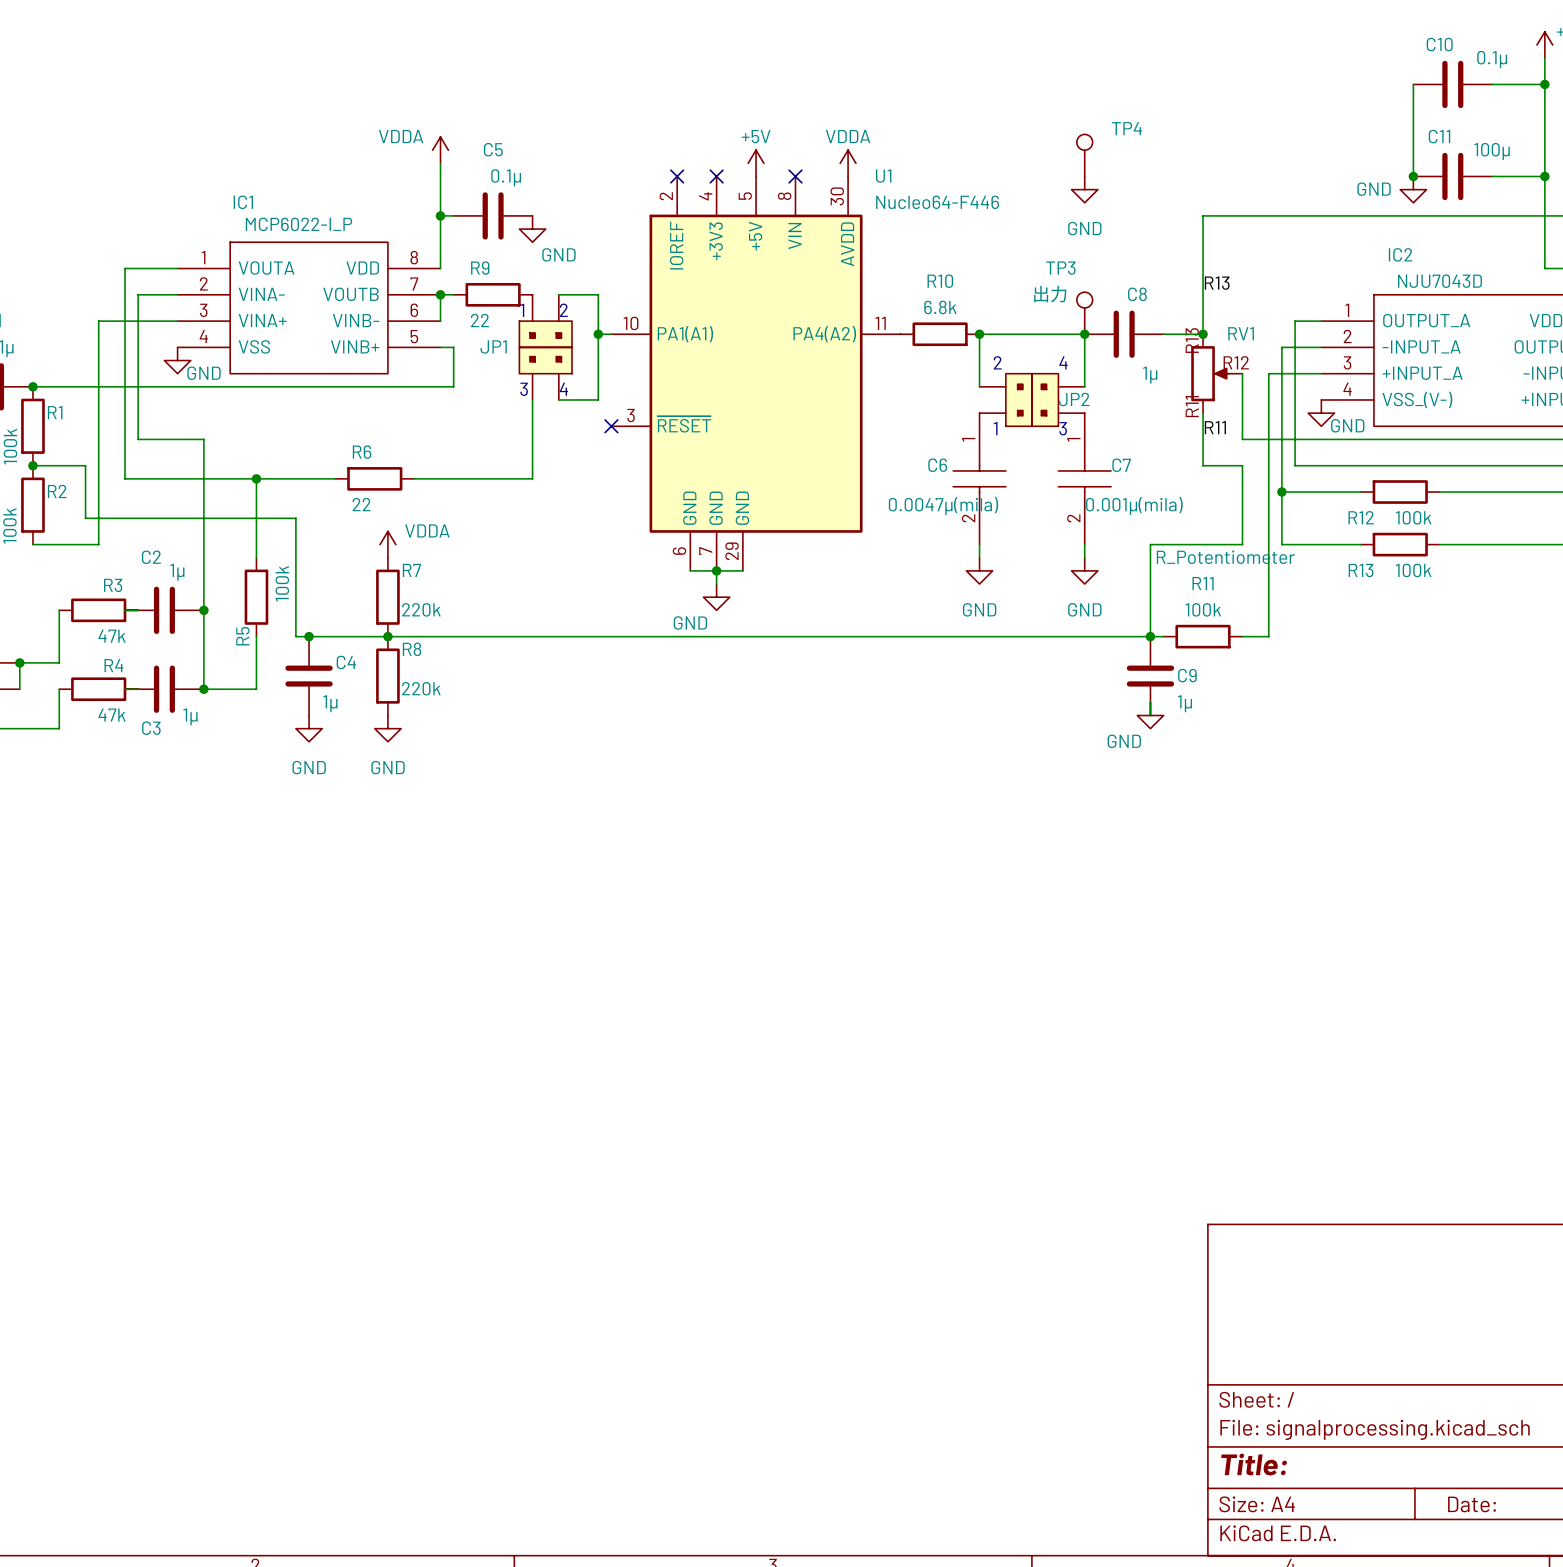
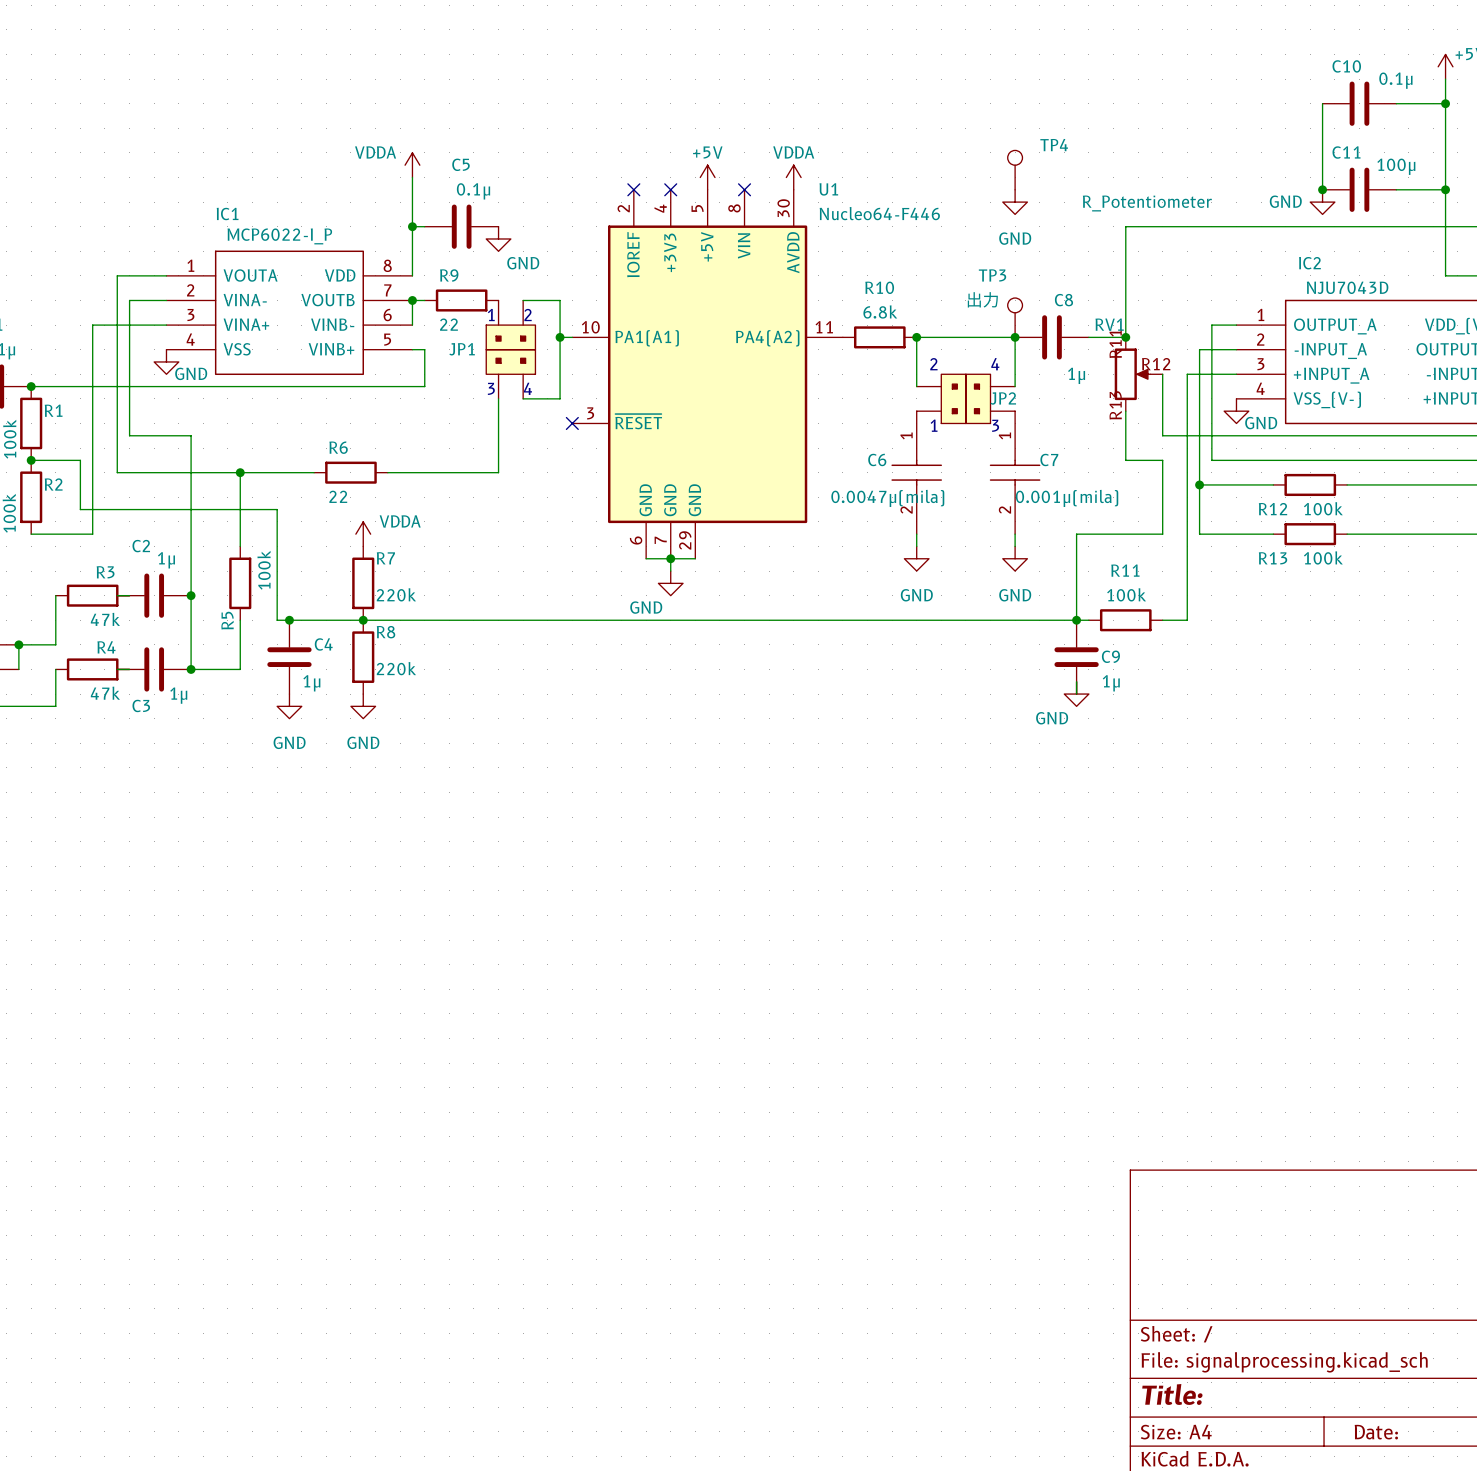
label: R13 (1217, 283) -> none
RV1 name position: RV1 (1241, 333) -> RV1 (1109, 324)
RV1 flip: as is (1210, 373) -> up-down (1132, 374)
label: R11 (1215, 427) -> none

